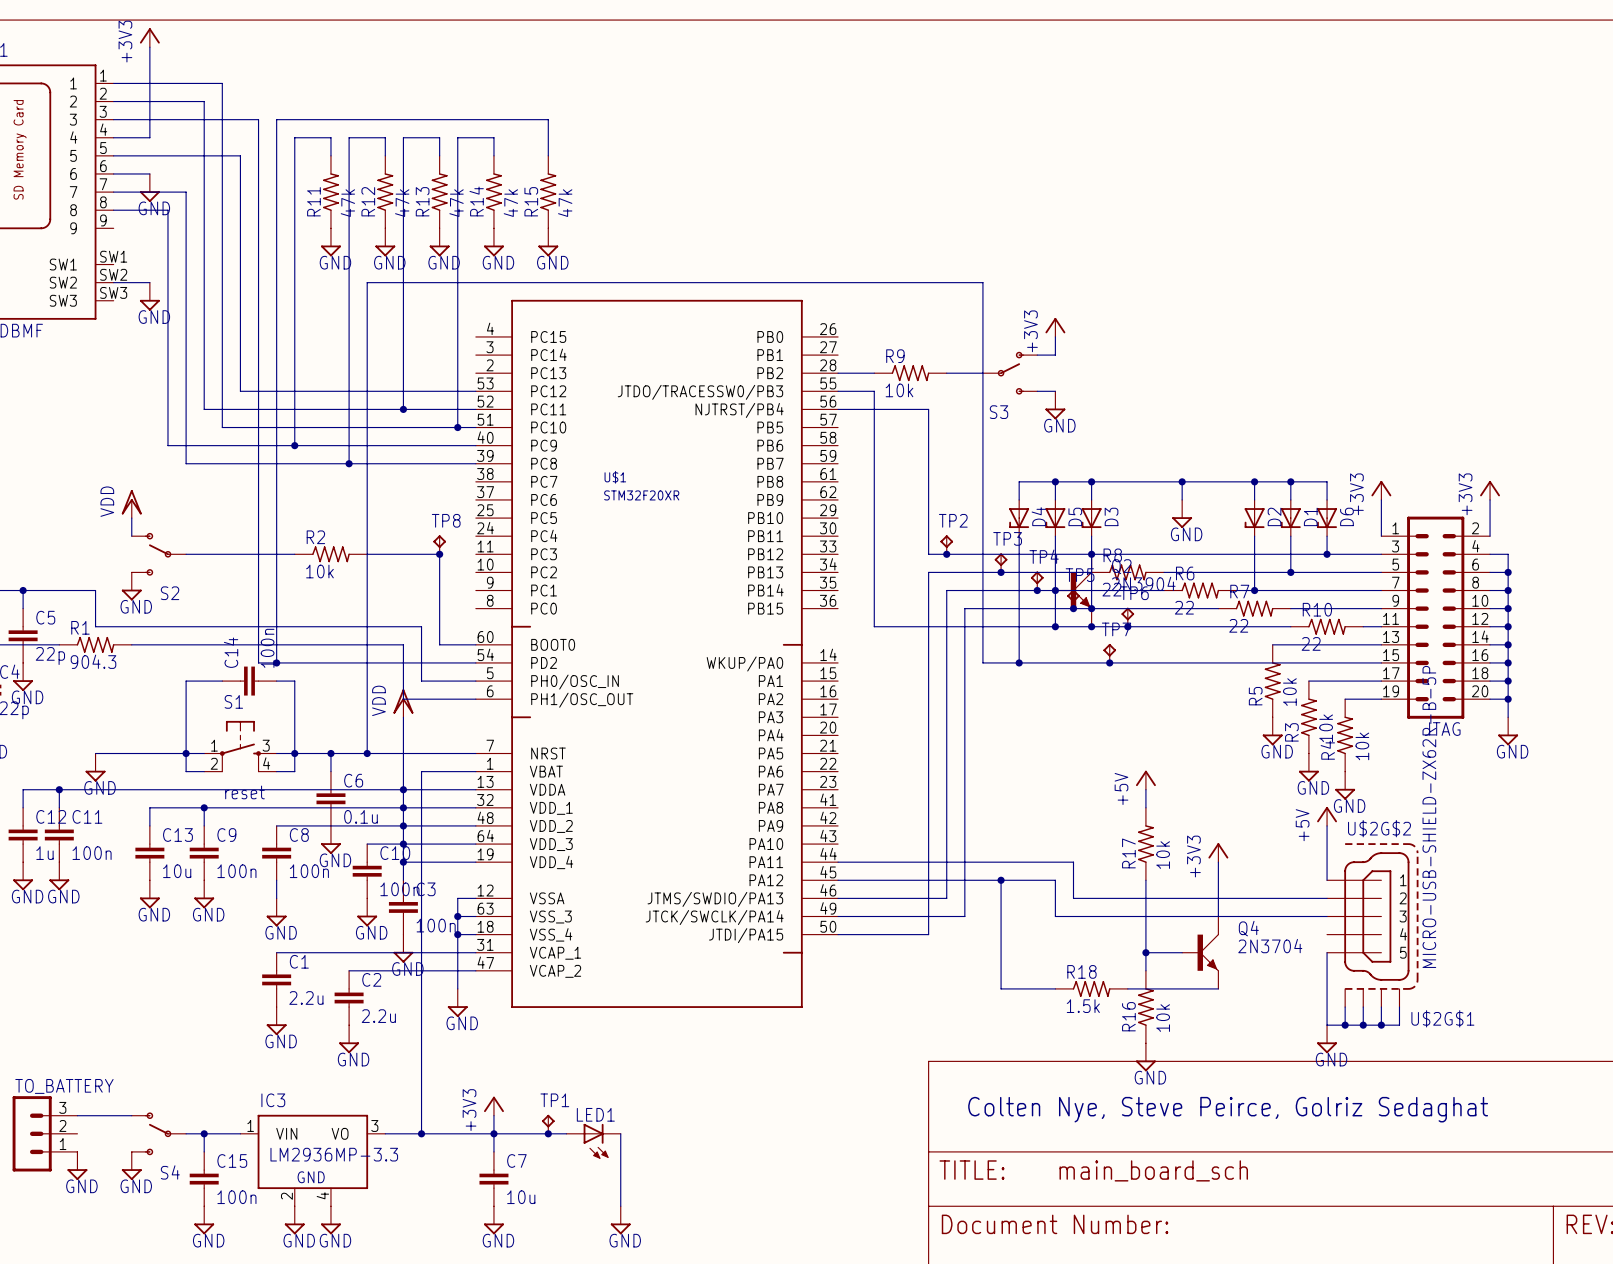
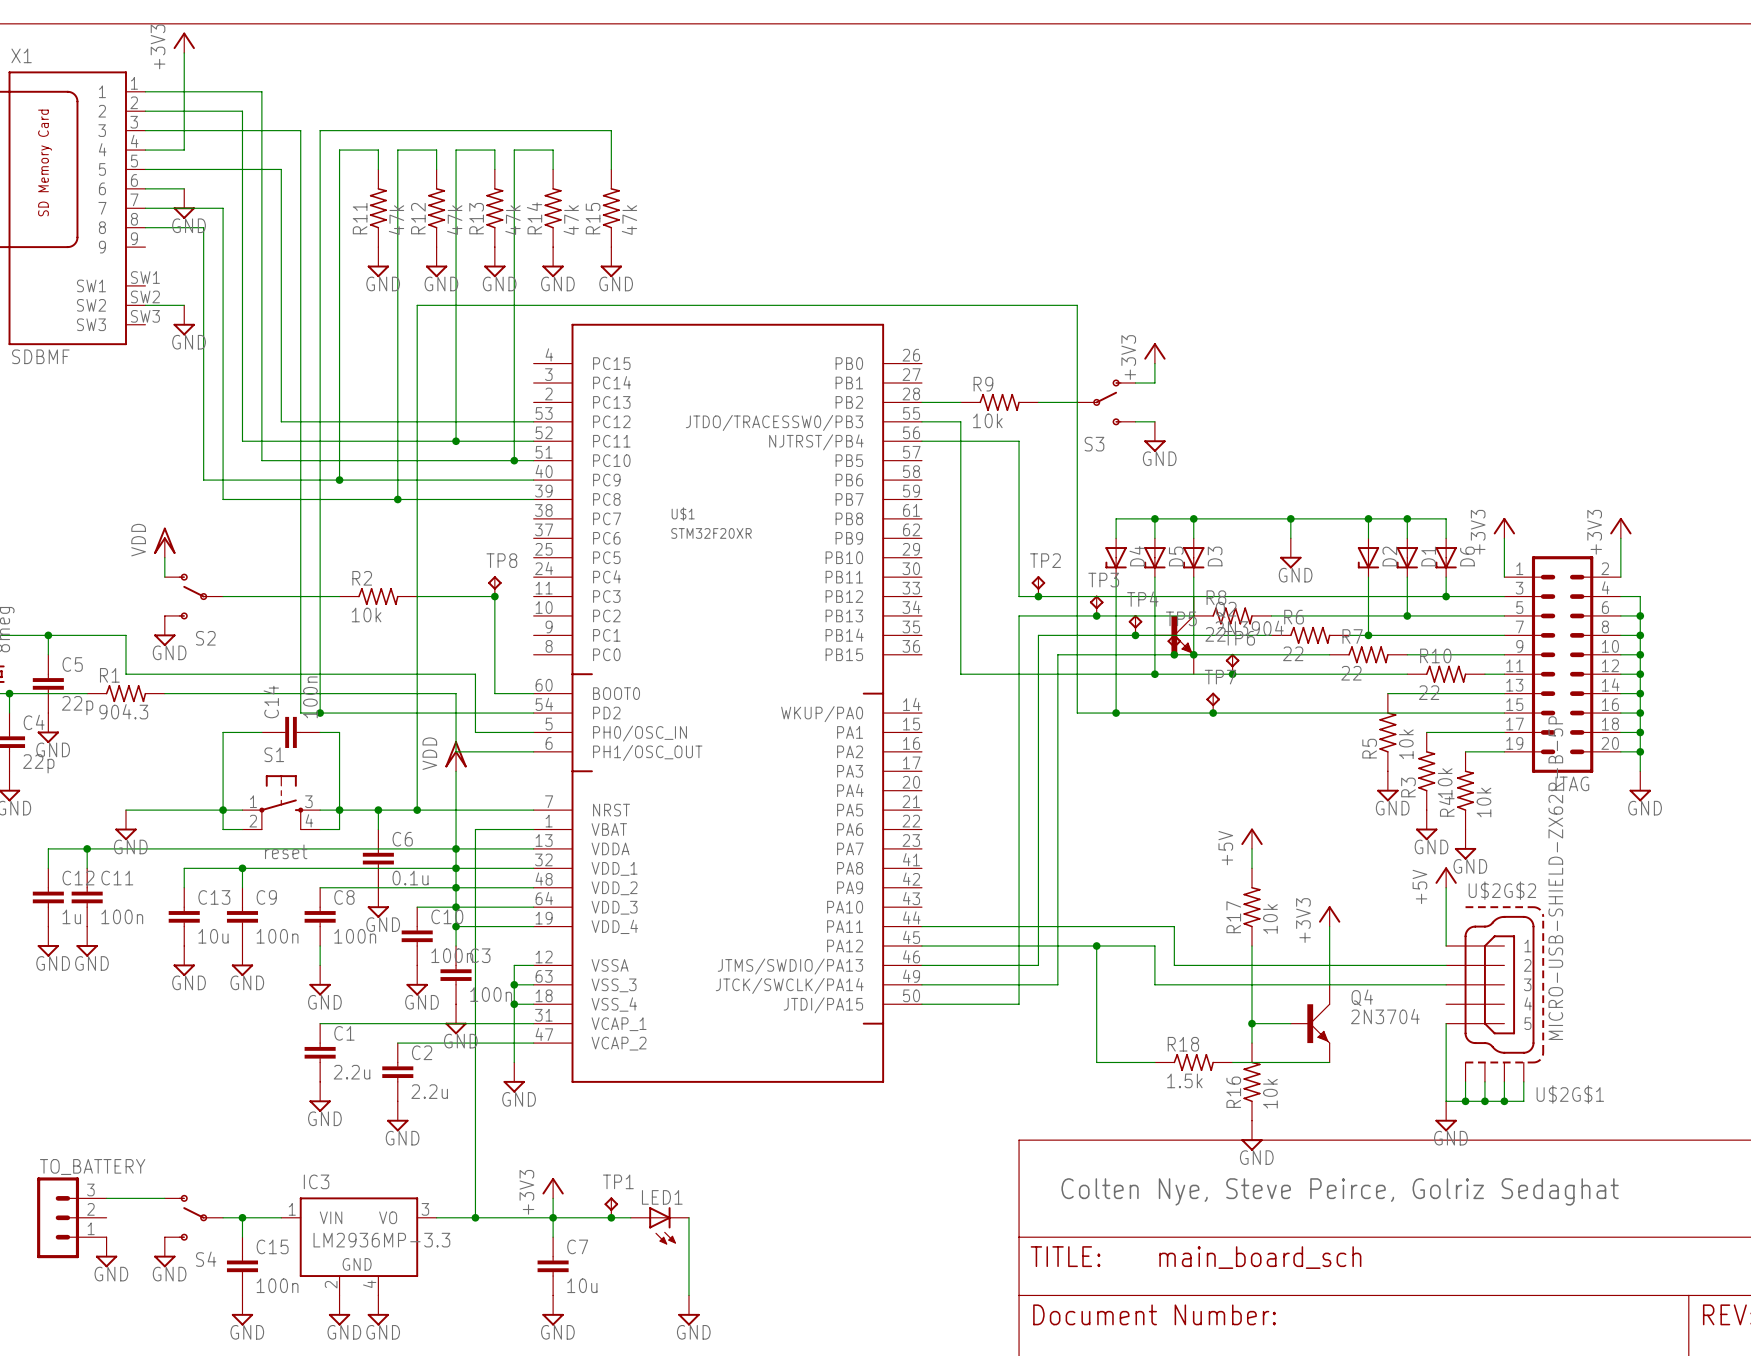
junction: (1091, 554) -> none
junction: (1055, 590) -> none
junction: (1091, 626) -> none

